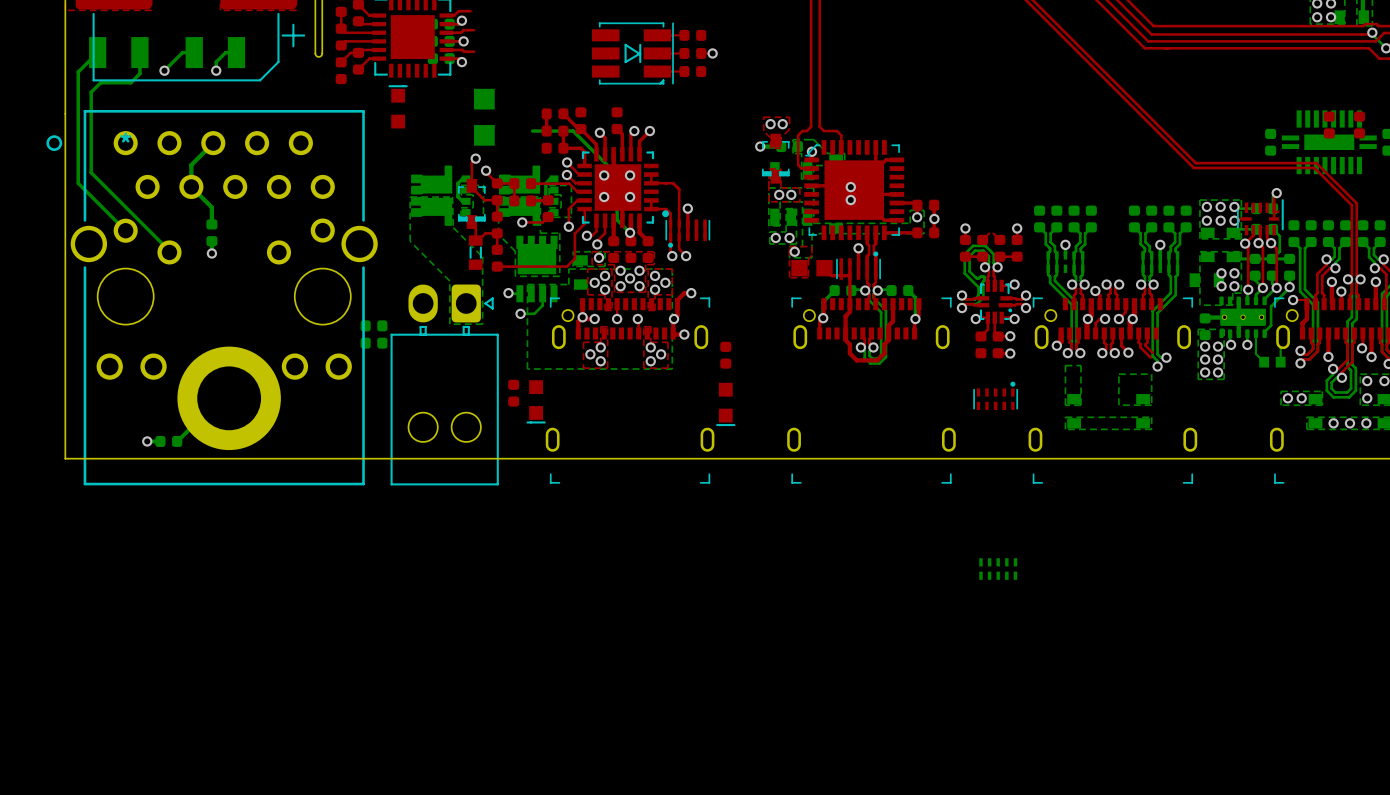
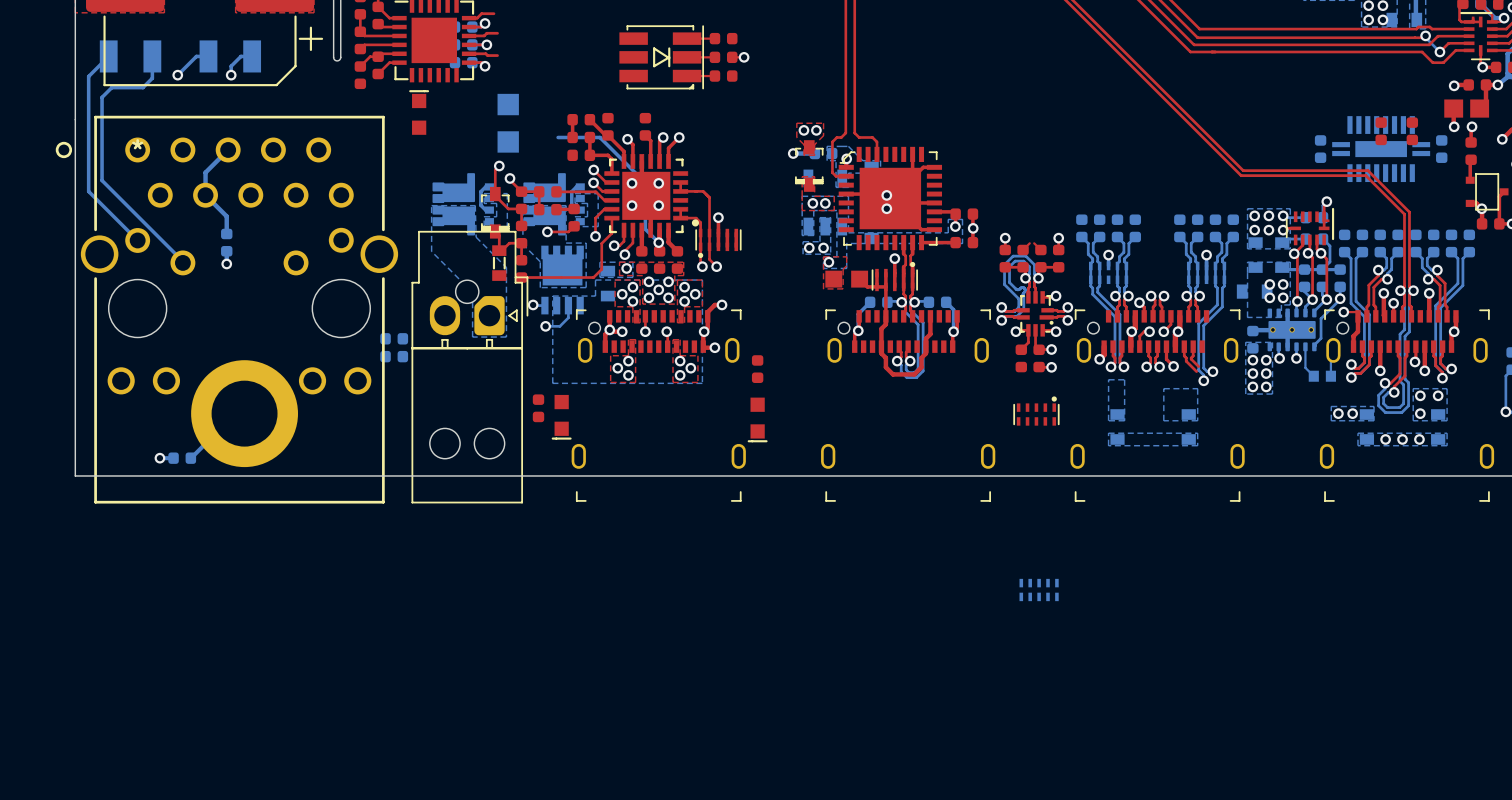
part footprint: [411, 165, 471, 226] -> [432, 173, 494, 236]
part: none -> (469, 367)
part: (444, 384) -> none

